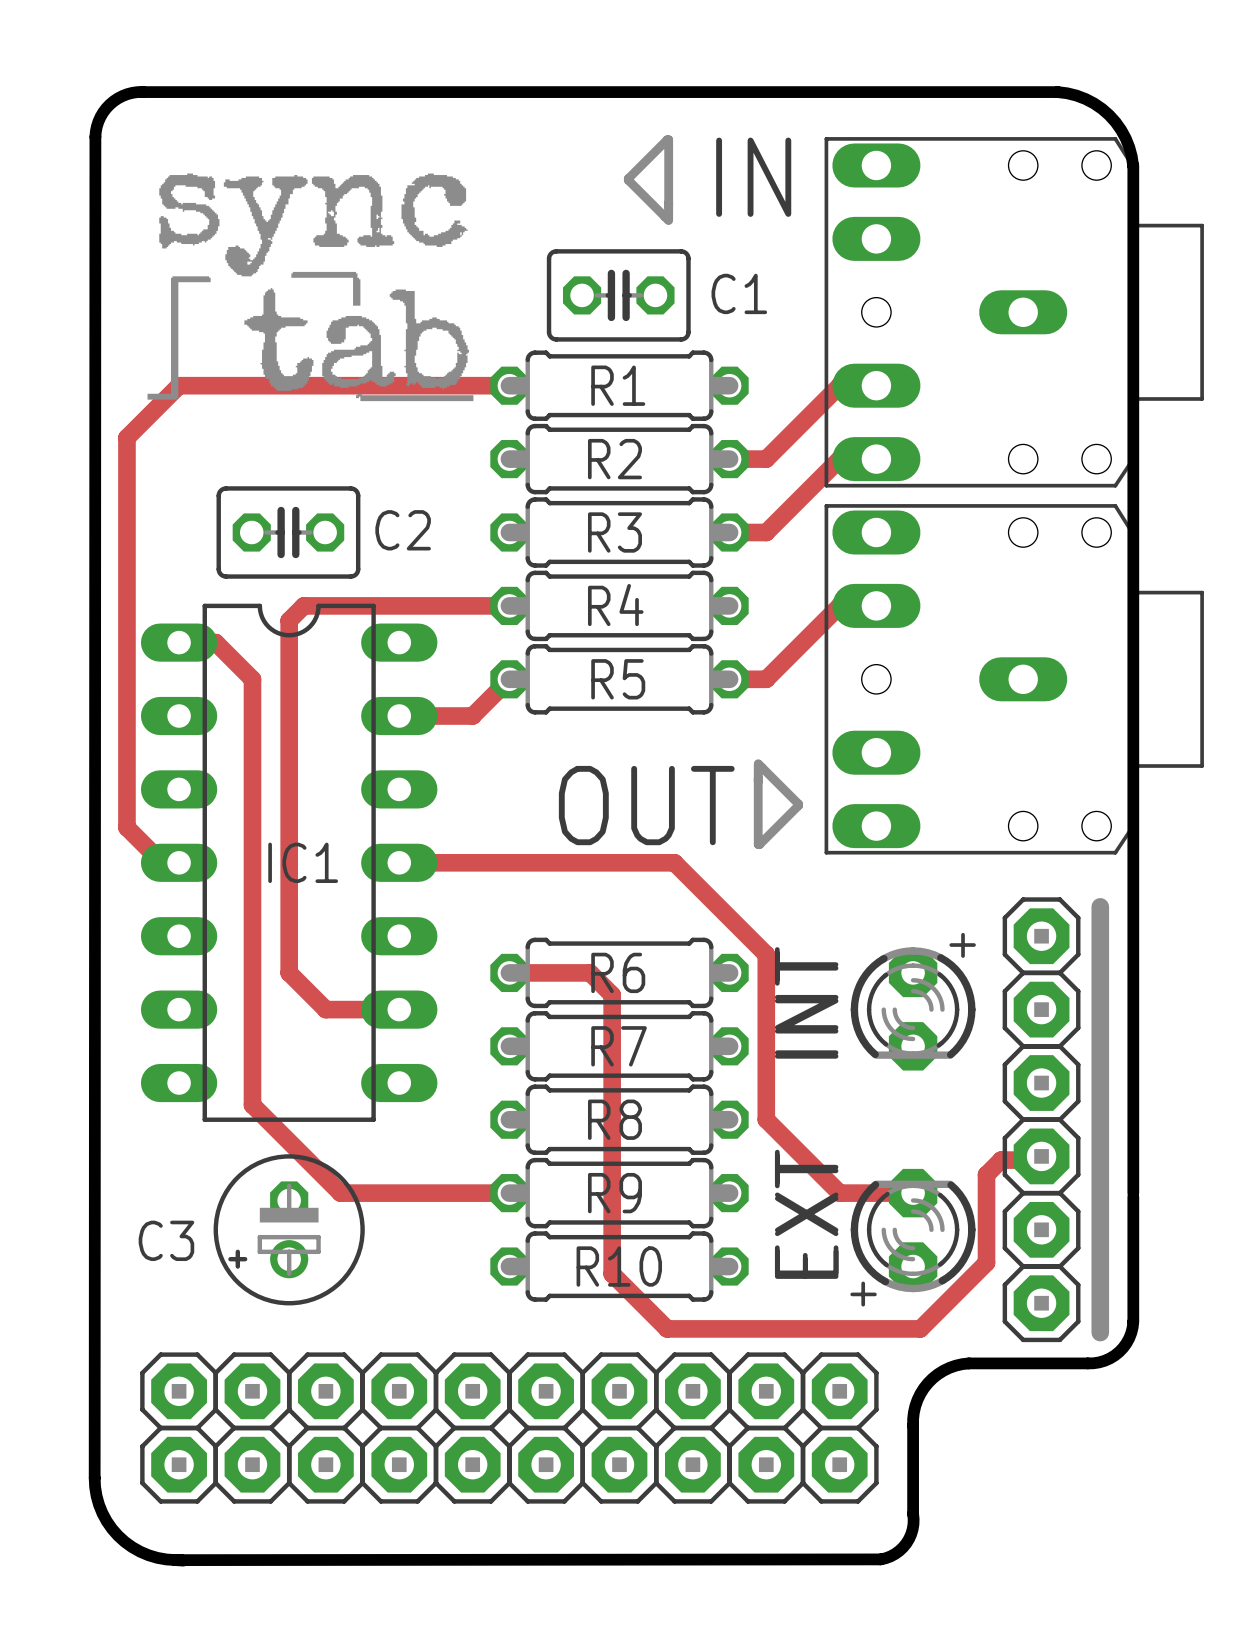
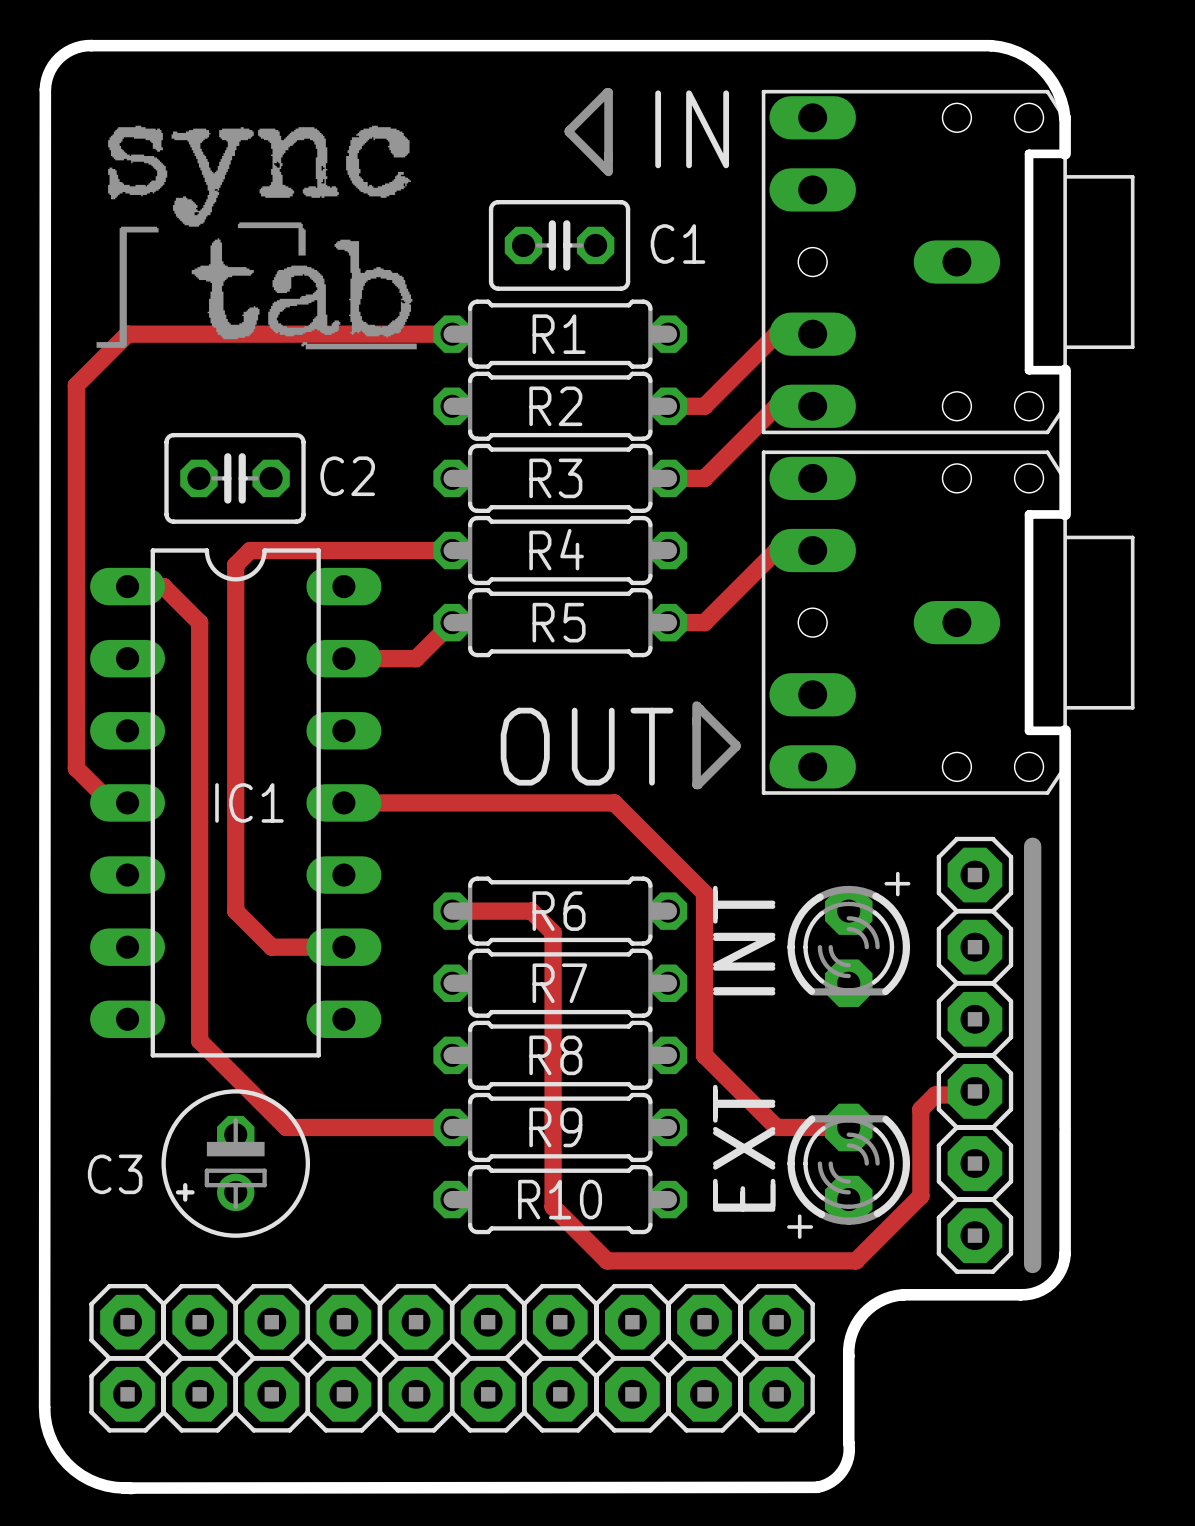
board edge: (1133, 202) (1133, 422) -> (1065, 153) (1029, 153) (1029, 370) (1065, 370)
board edge: (1133, 569) (1133, 789) -> (1065, 514) (1029, 514) (1029, 730) (1065, 730)

